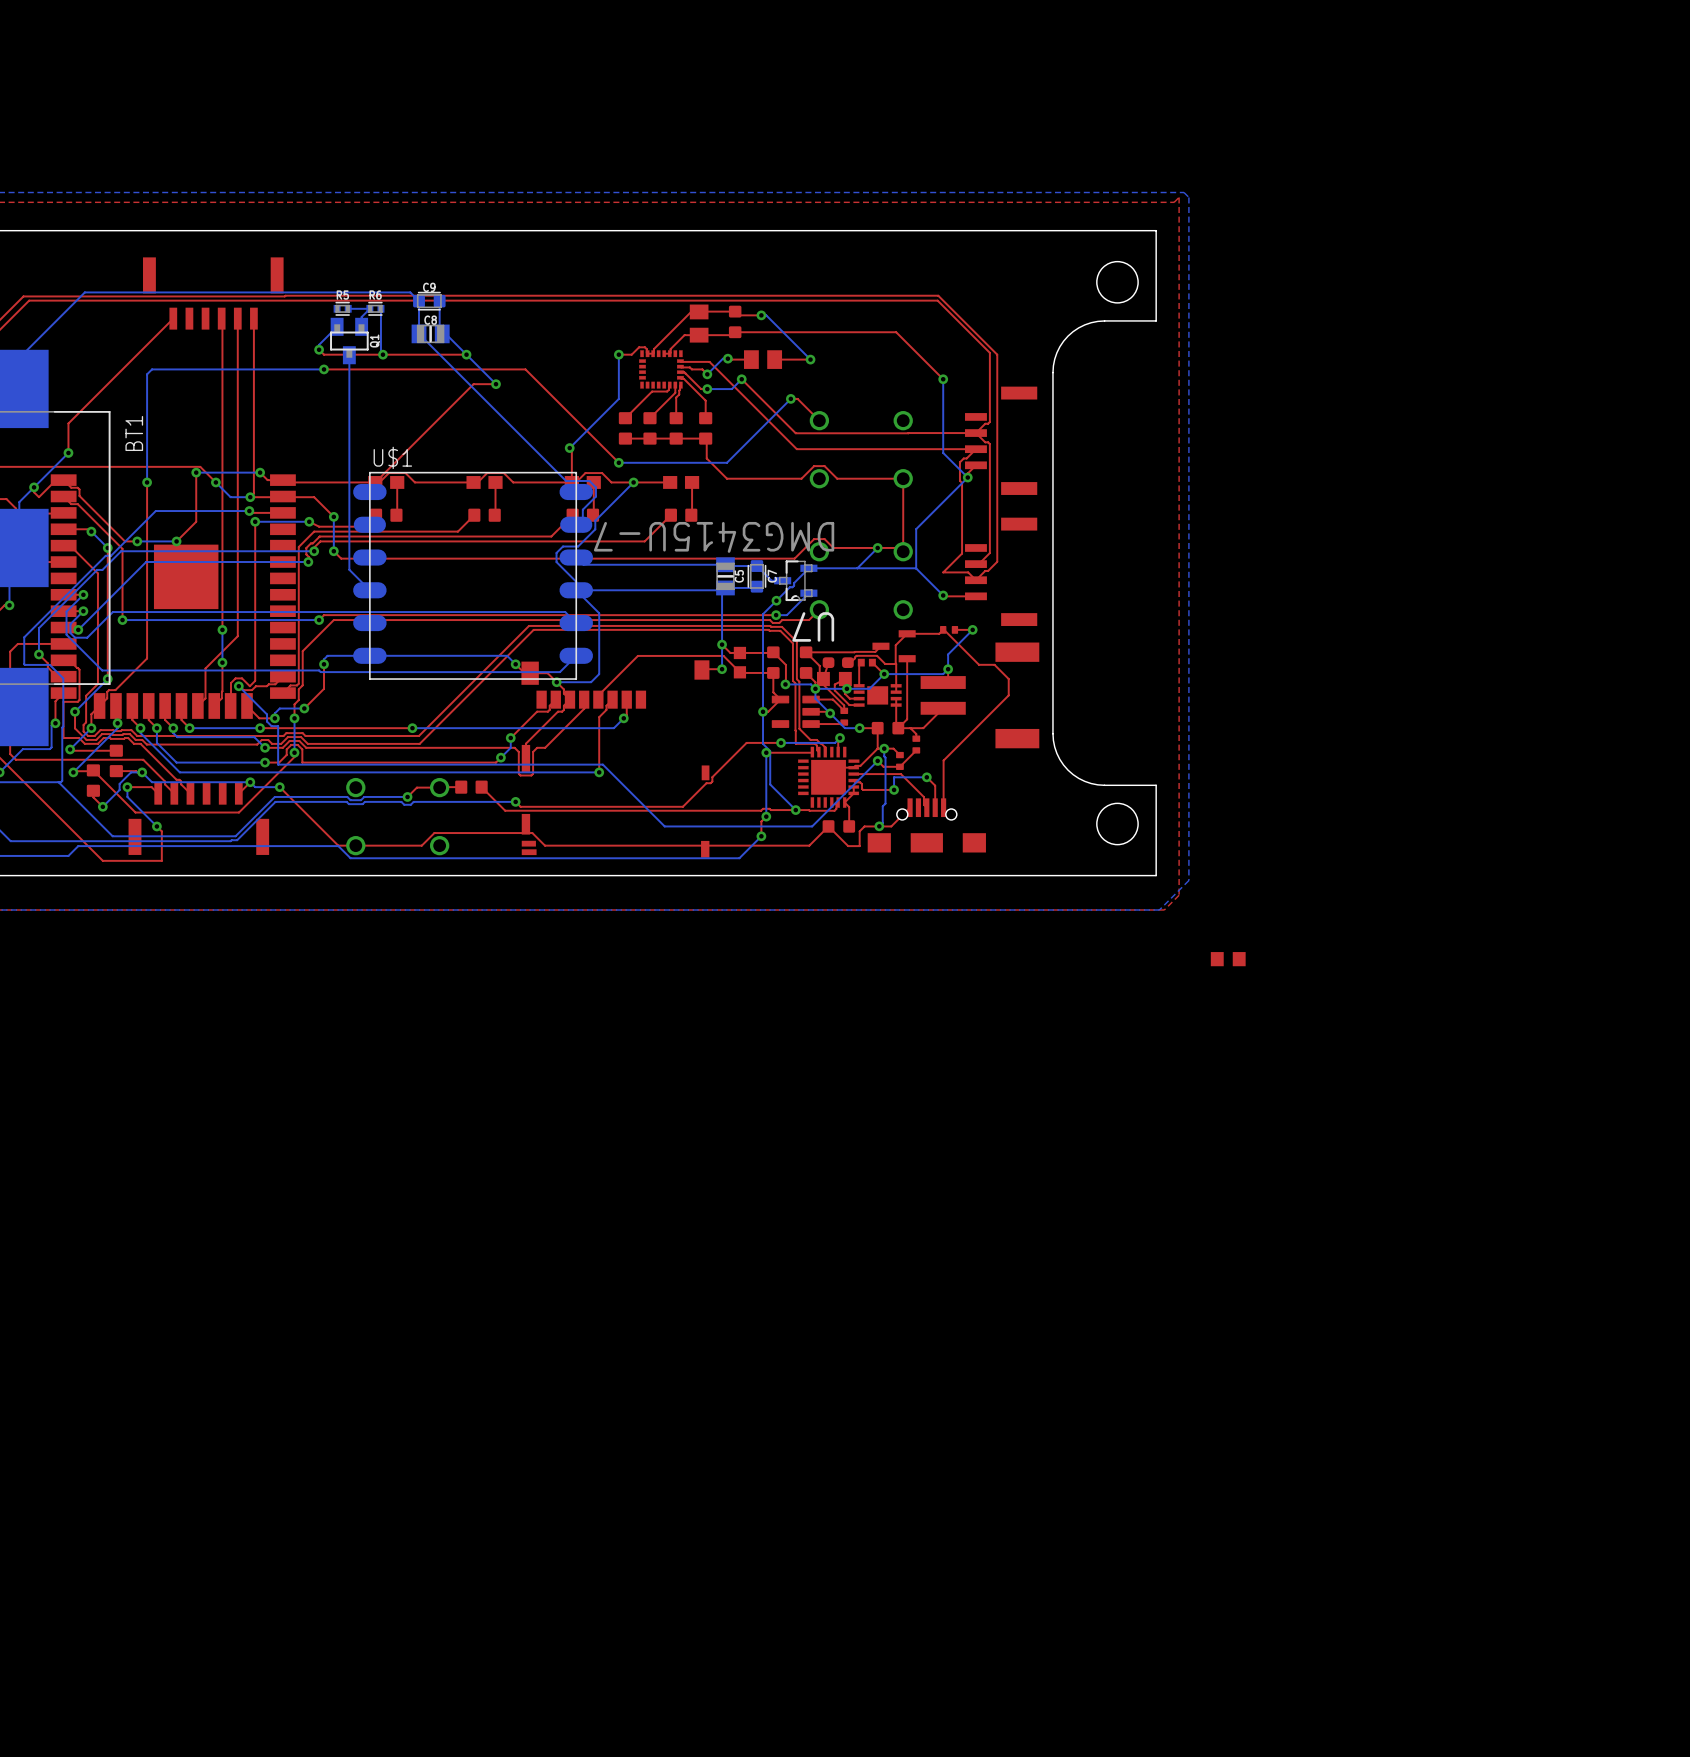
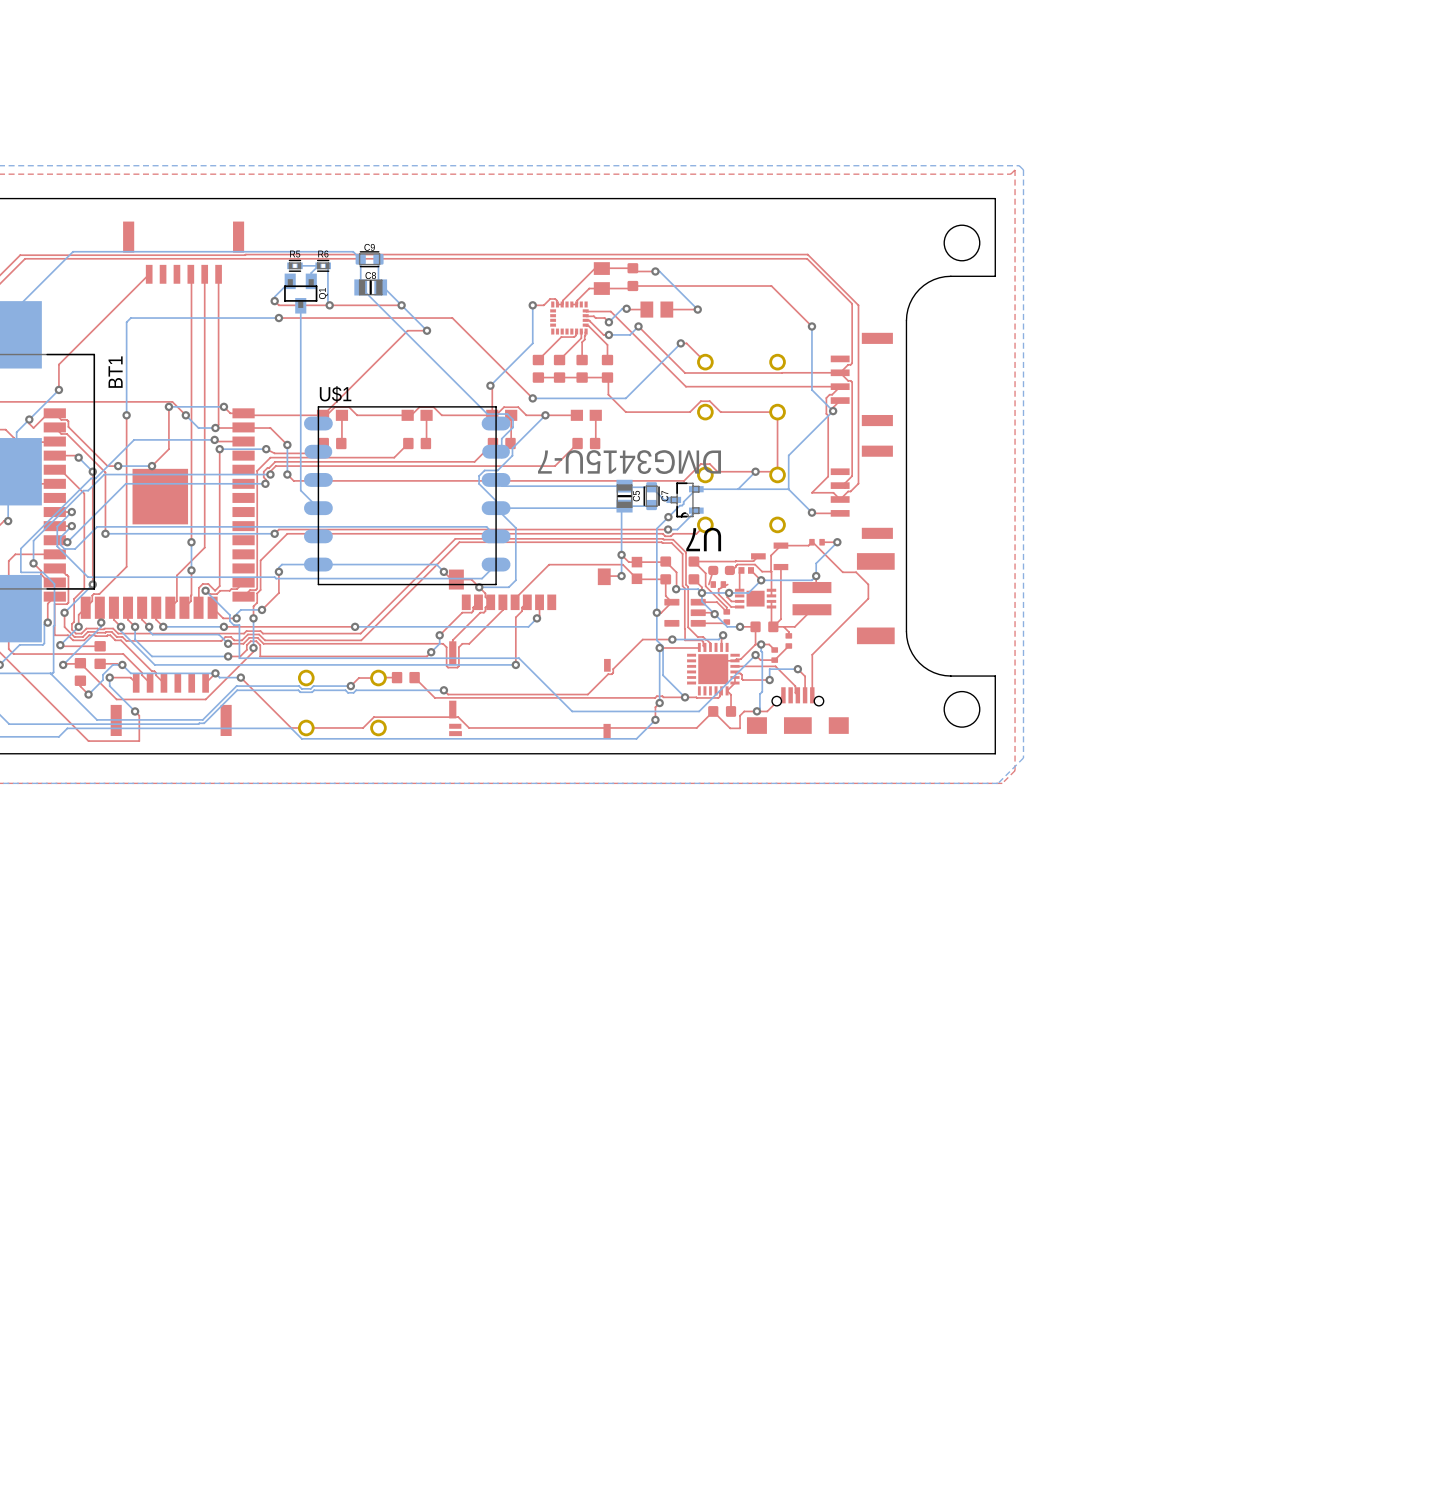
part footprint: [817, 671, 852, 687] -> [710, 581, 727, 588]
part: (1228, 959) -> none

